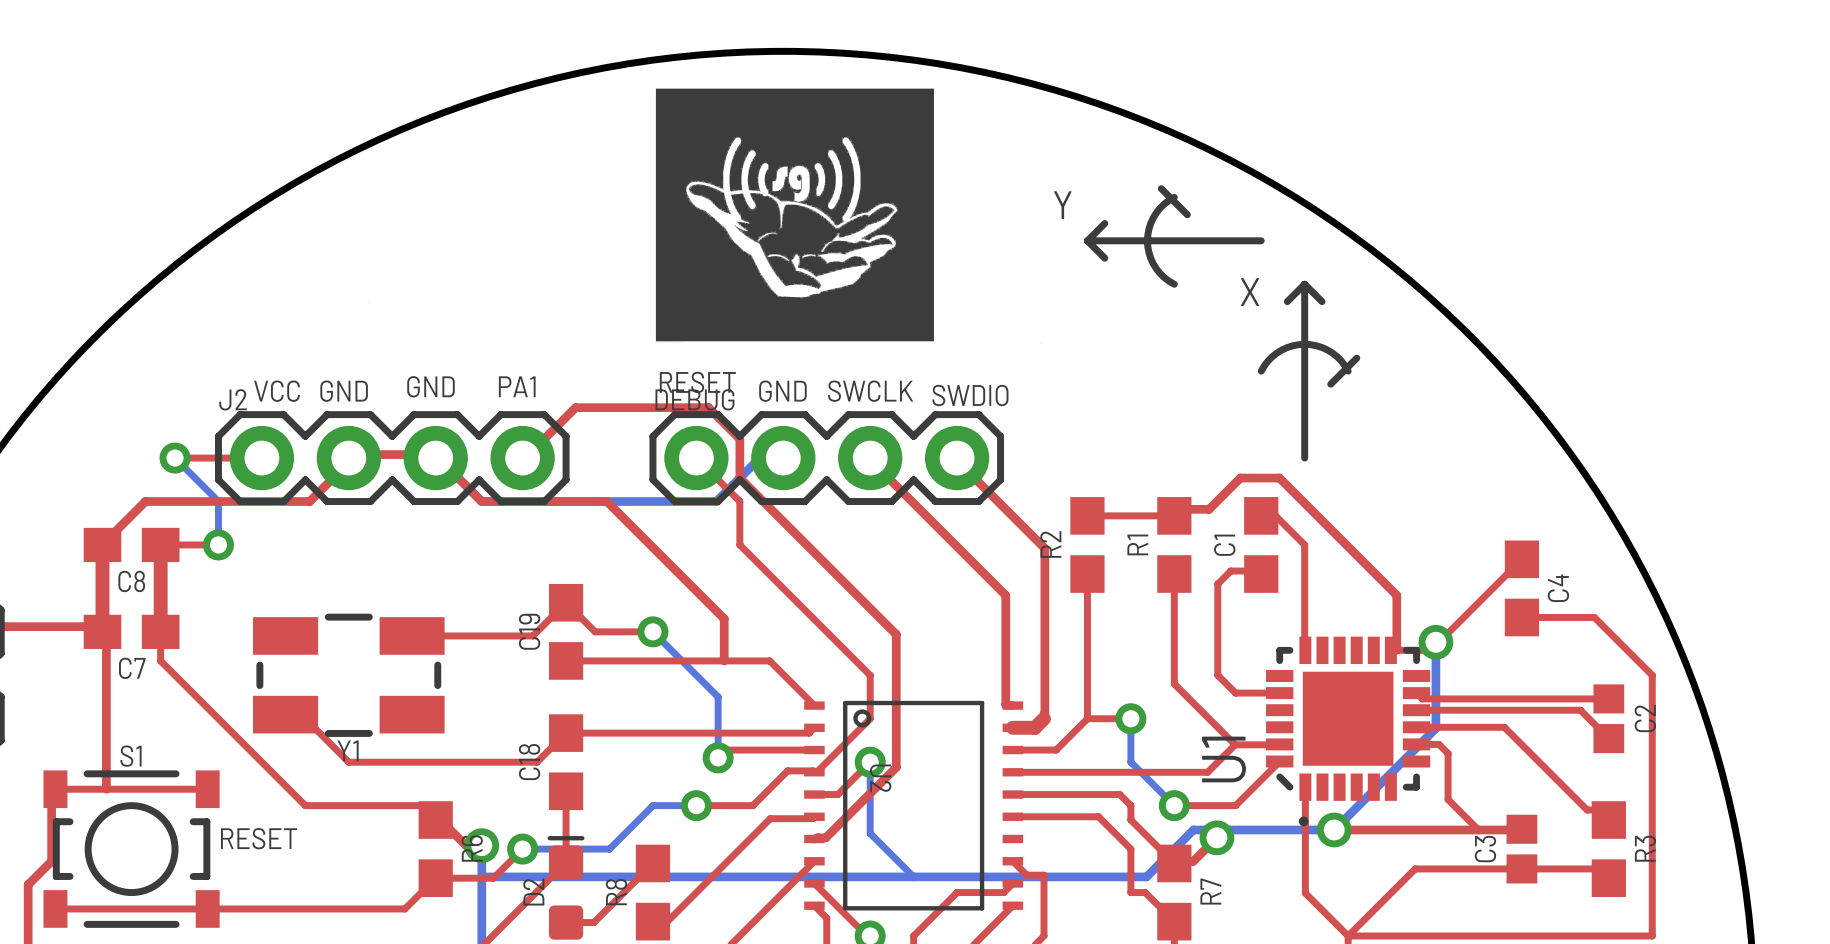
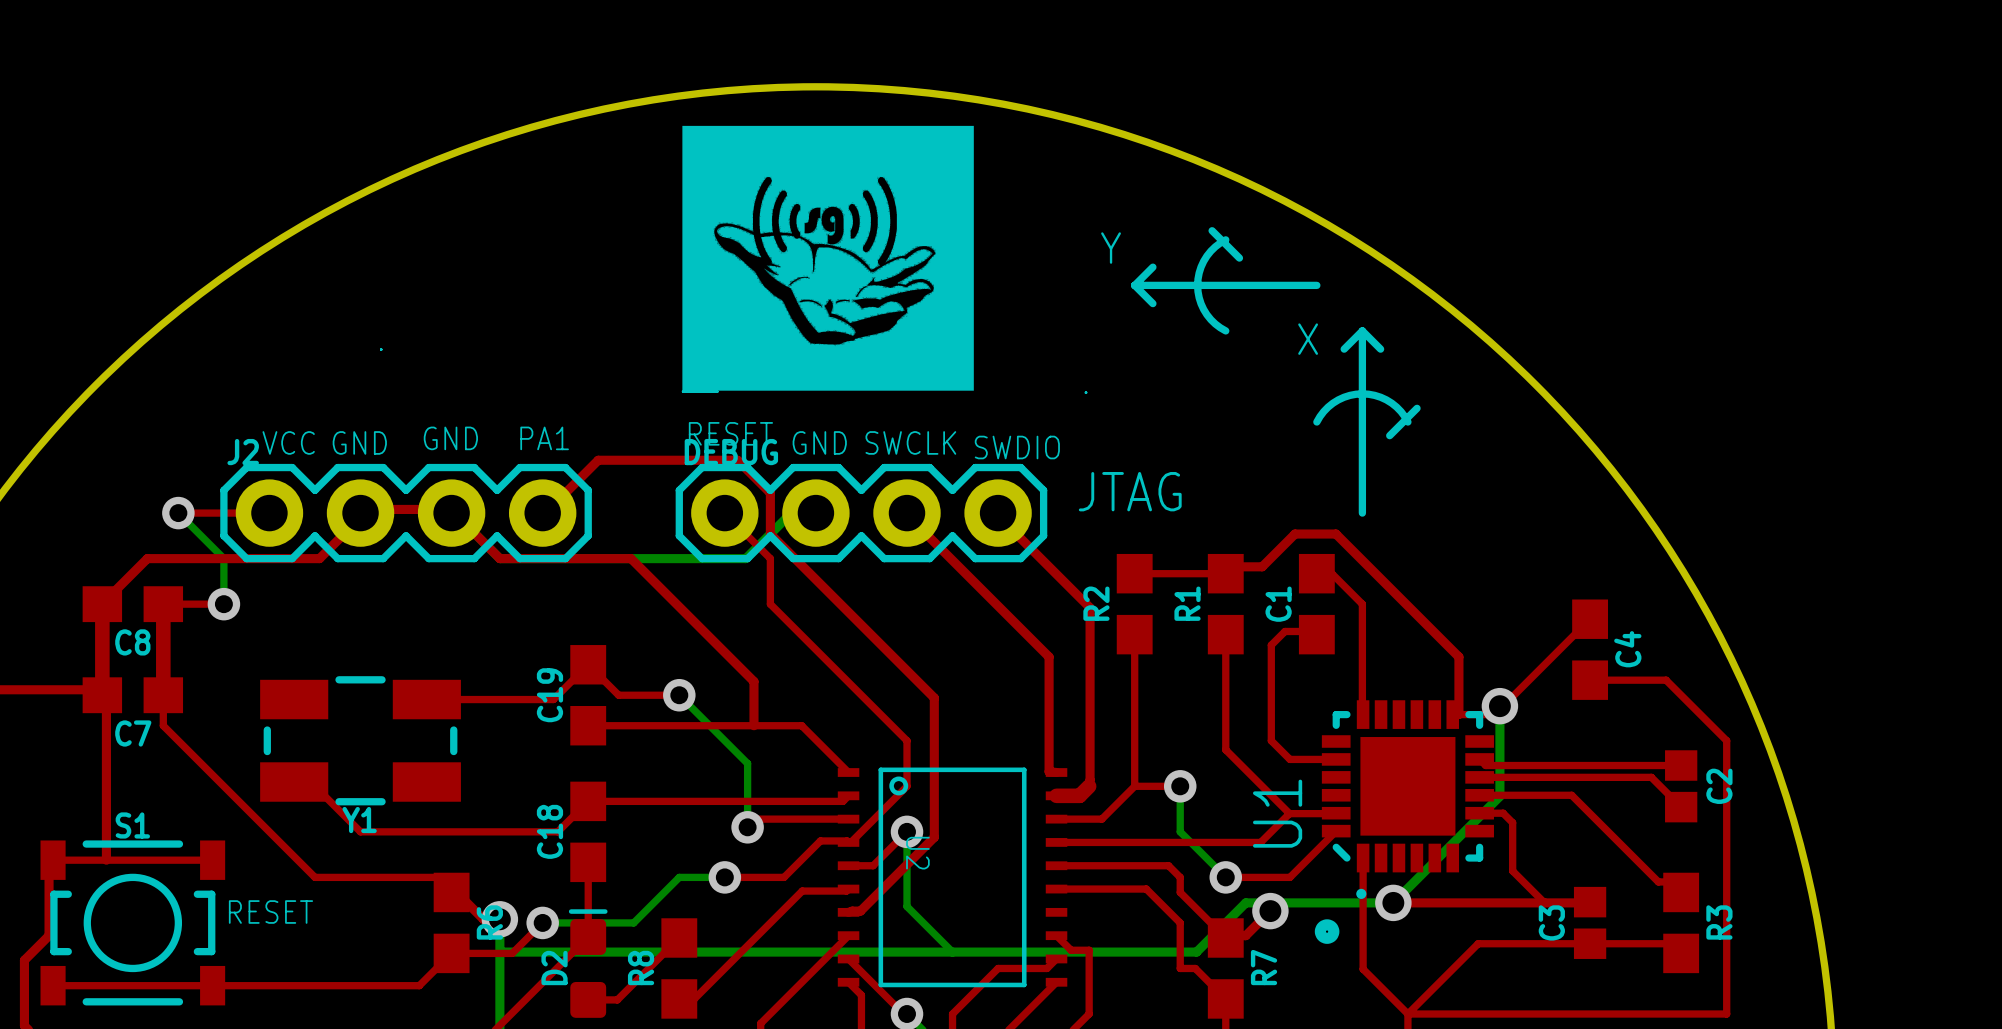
text: none -> JTAG (1130, 491)
drawing: none -> [1314, 919, 1340, 944]

